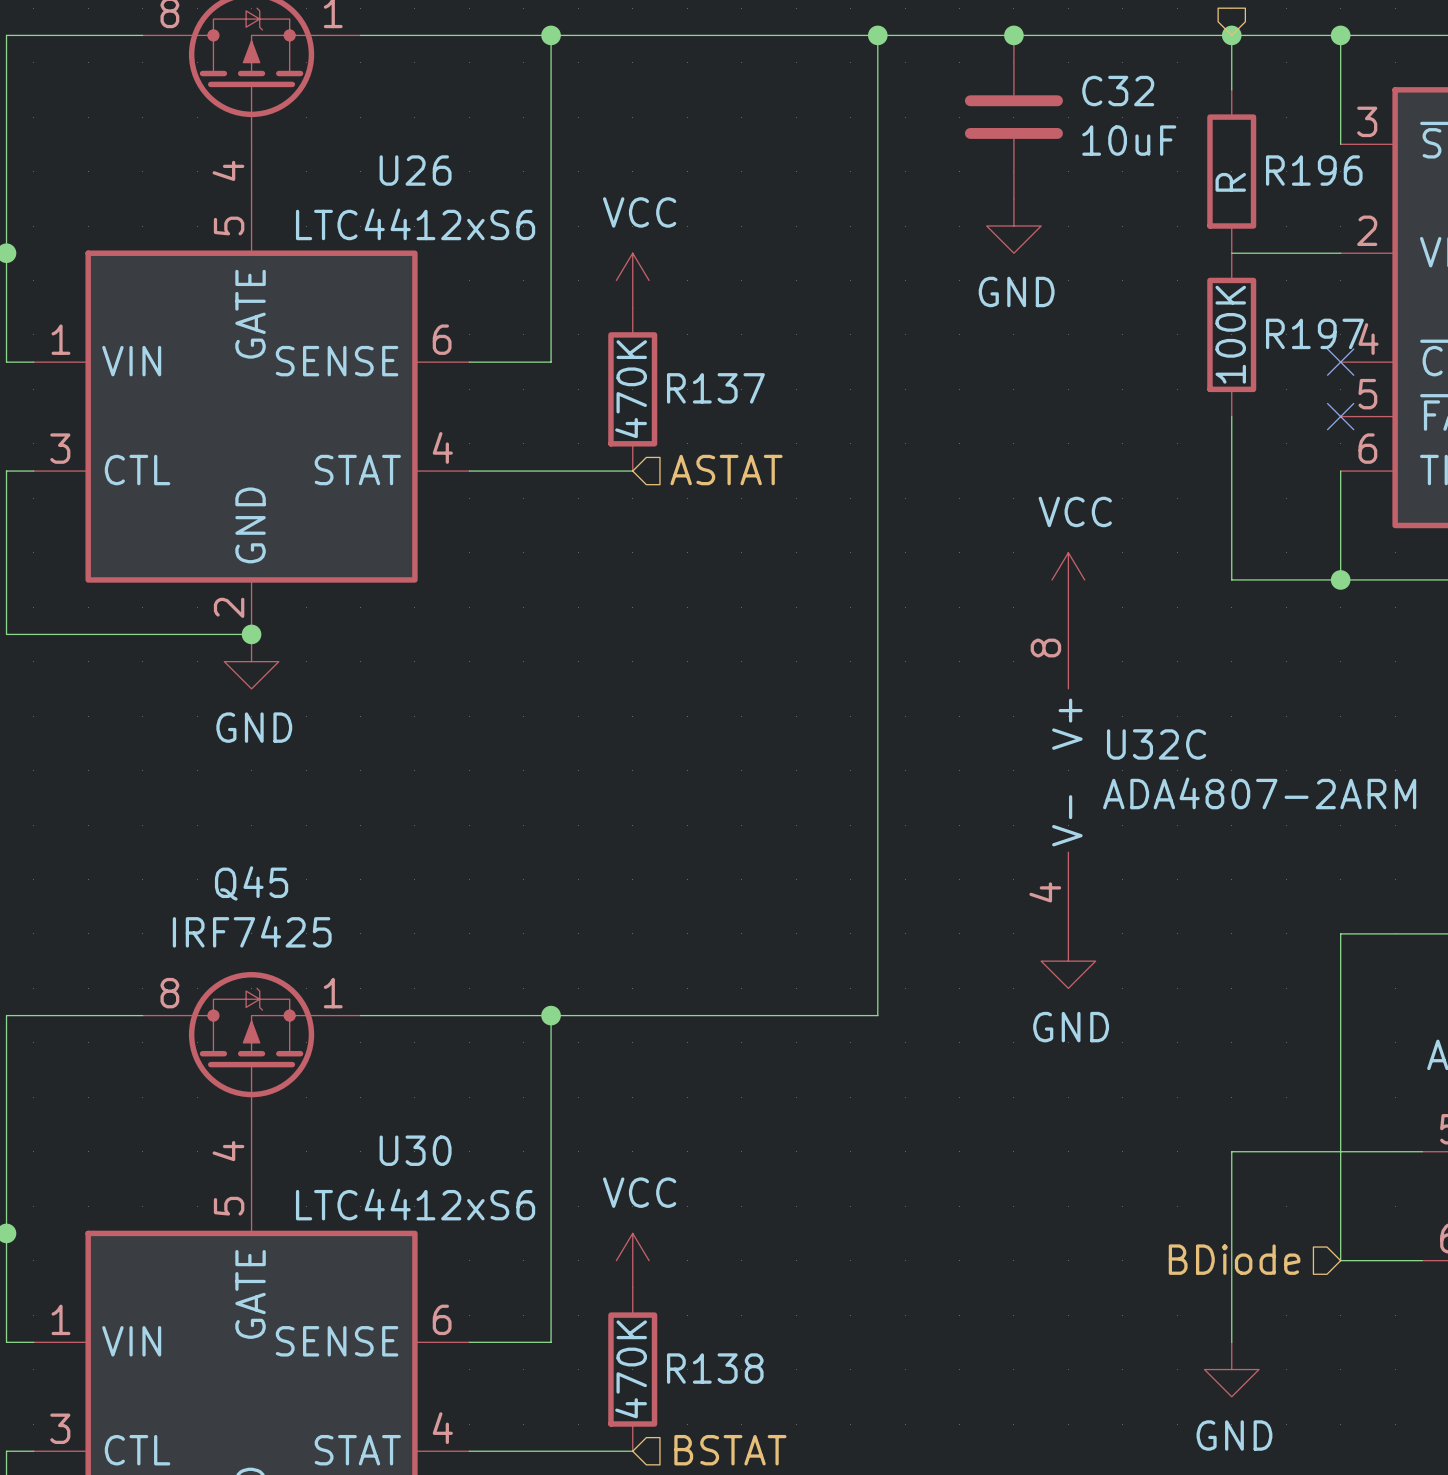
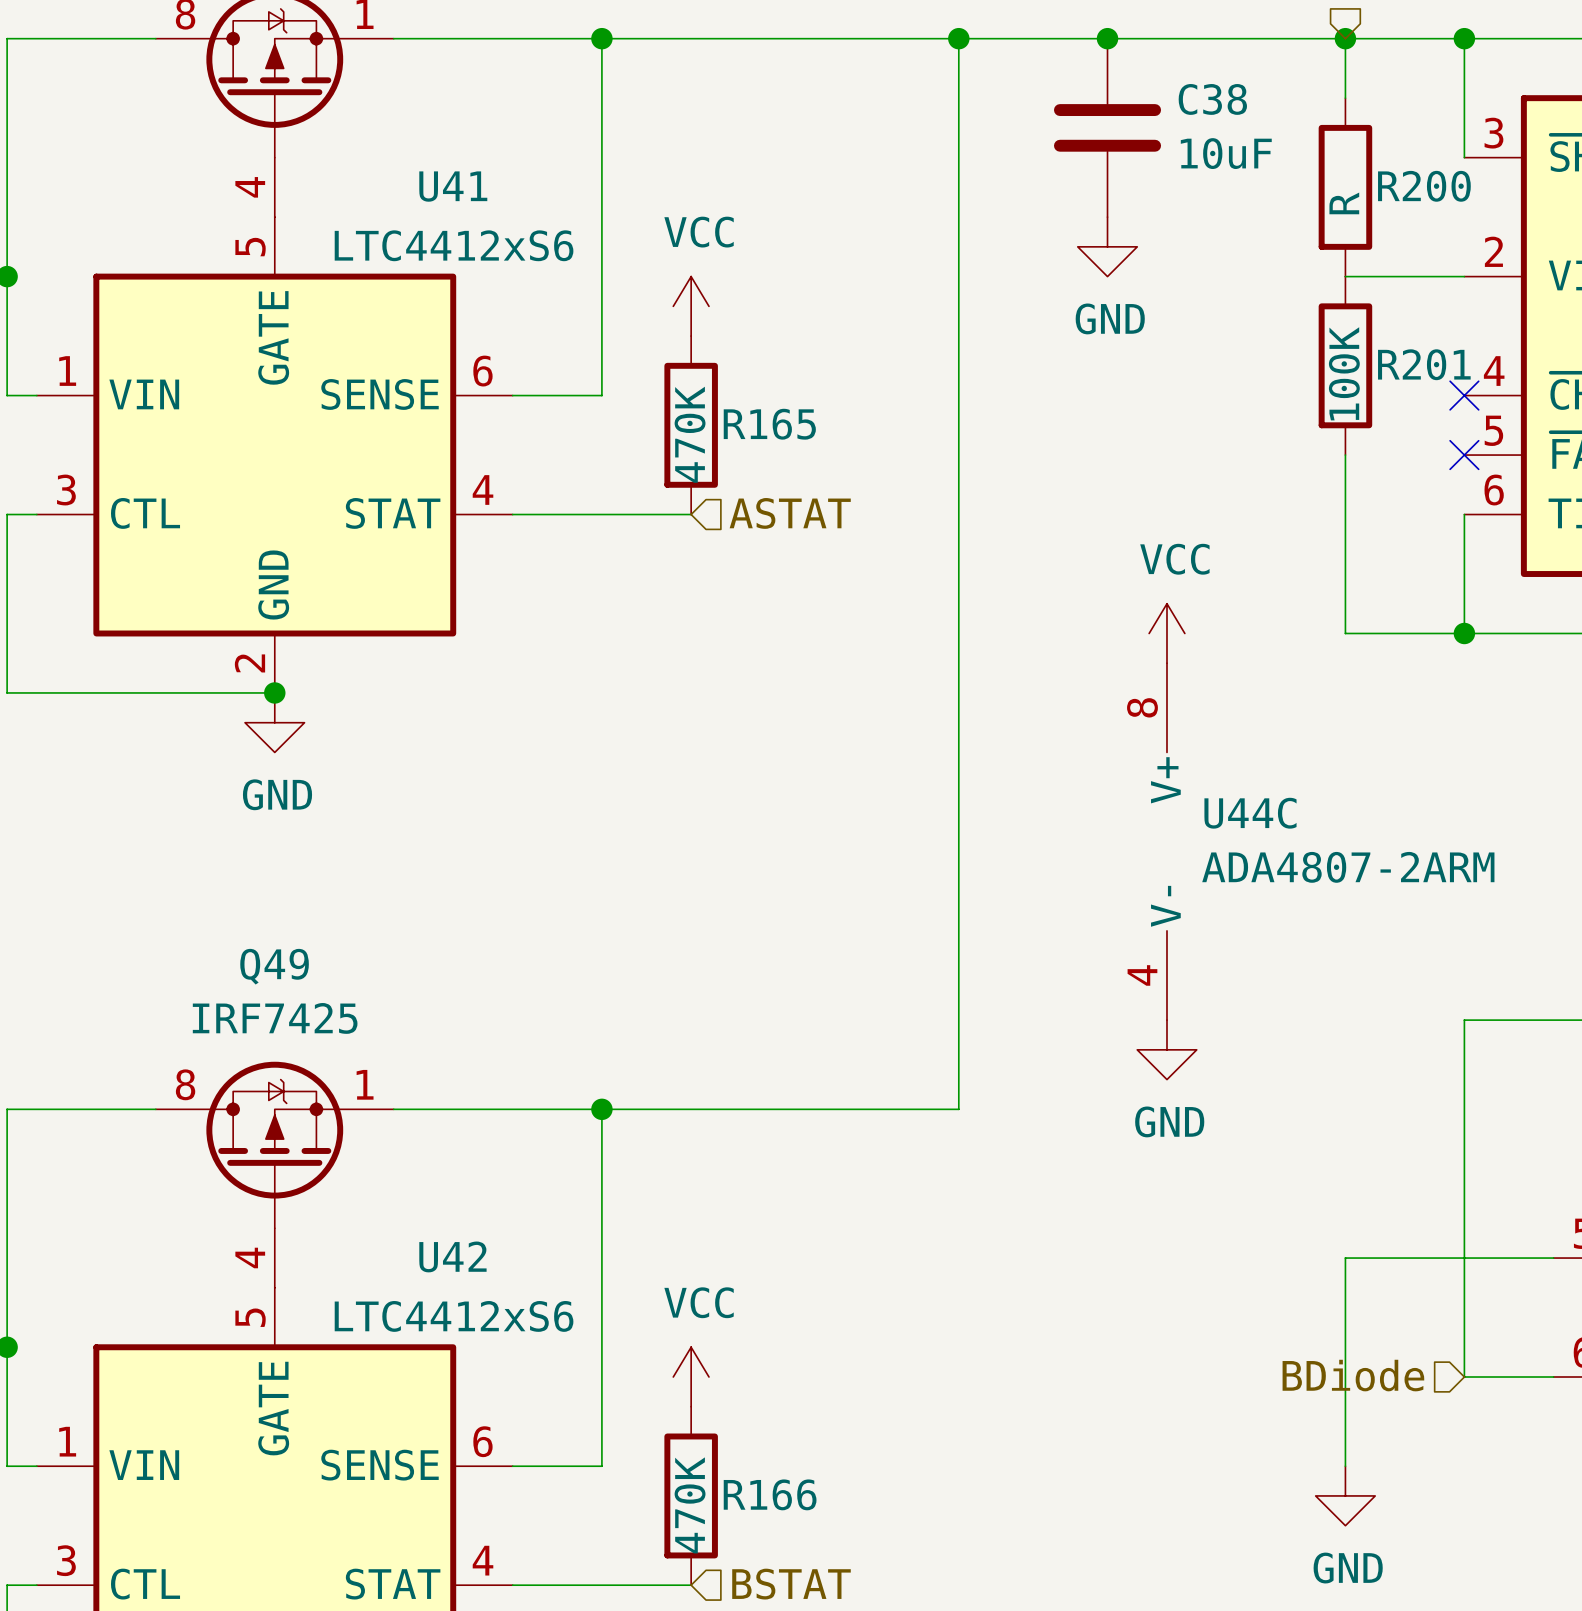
C32 name: C32 (1118, 91) -> C38 (1212, 99)
U26 name: U26 (415, 170) -> U41 (453, 186)
R196 name: R196 (1314, 170) -> R200 (1424, 186)
R197 name: R197 (1314, 333) -> R201 (1424, 364)
R137 name: R137 (715, 388) -> R165 (769, 424)
U32C name: U32C (1156, 744) -> U44C (1250, 813)
Q45 name: Q45 (251, 883) -> Q49 (274, 966)
U30 name: U30 (415, 1150) -> U42 (452, 1256)
R138 name: R138 (715, 1368) -> R166 (770, 1494)

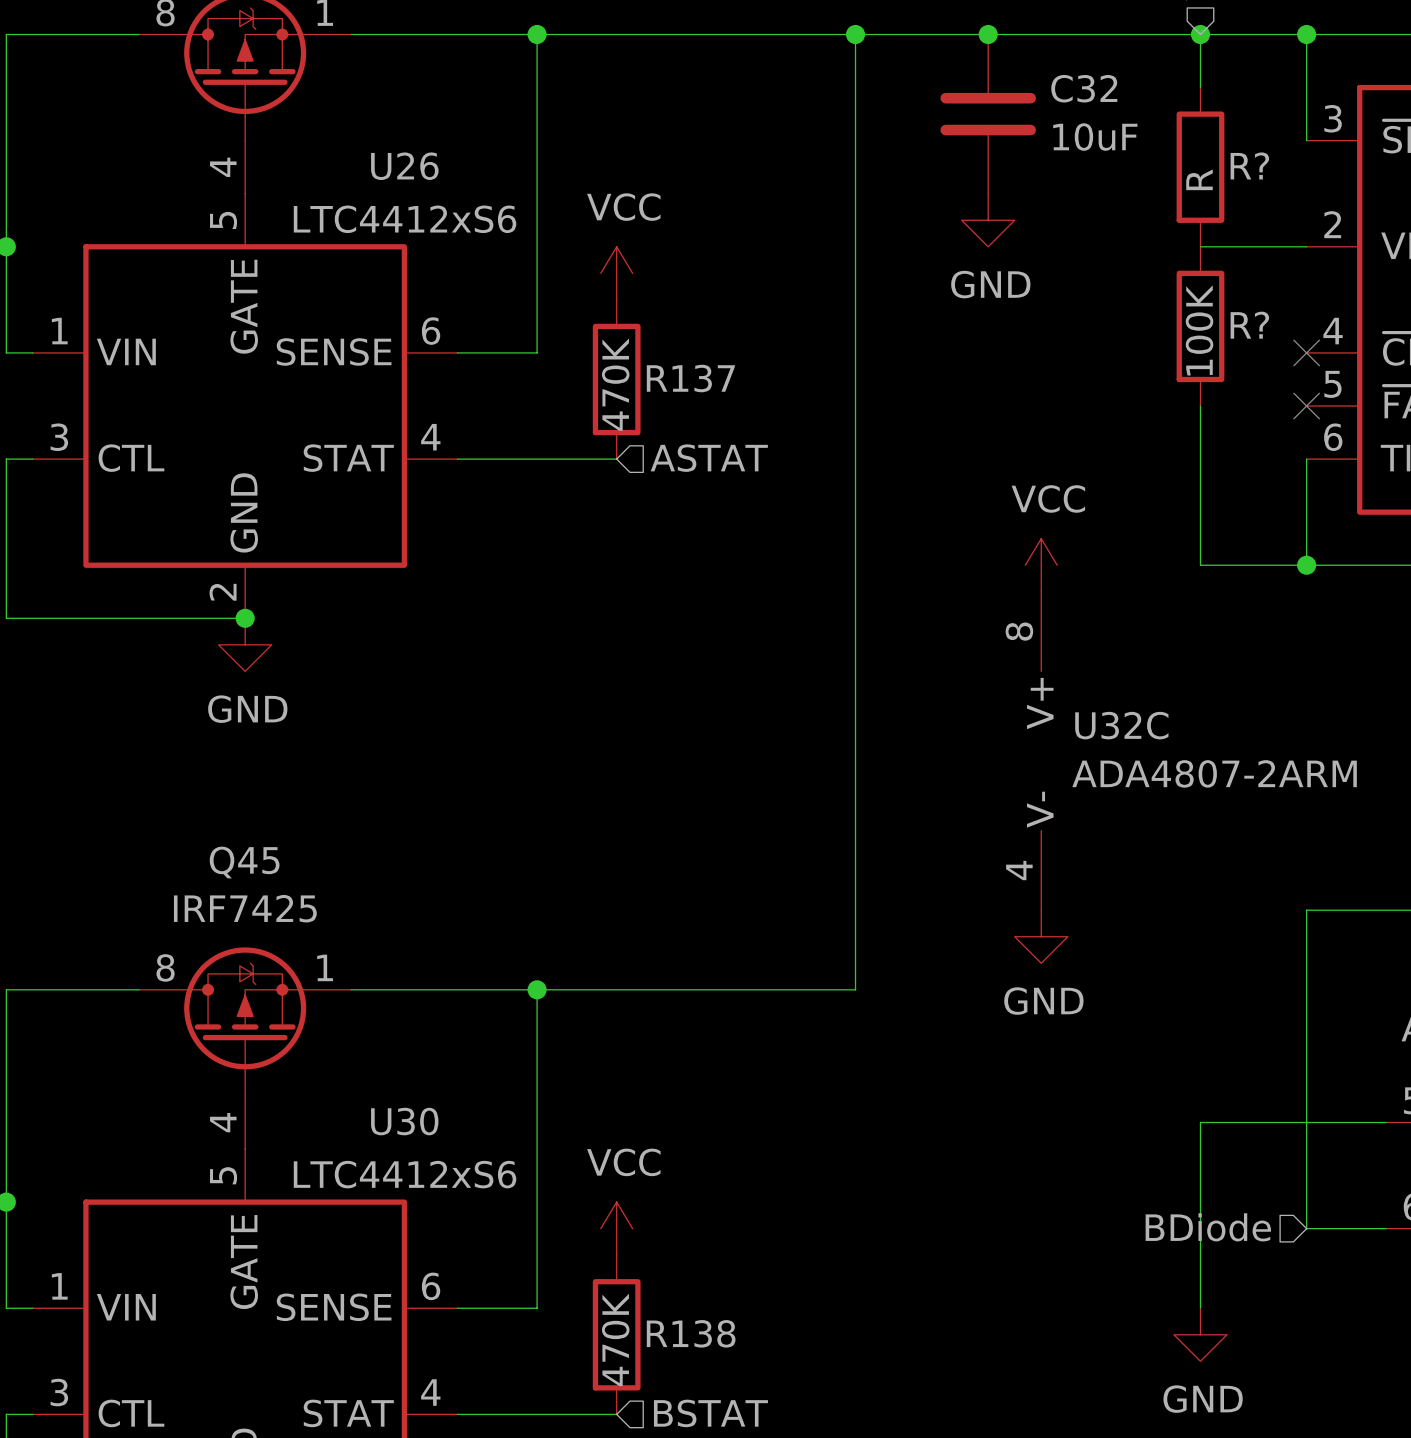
C38 name: C38 (1212, 99) -> C32 (1084, 88)
U41 name: U41 (453, 186) -> U26 (404, 166)
R200 name: R200 (1424, 186) -> R? (1249, 165)
R201 name: R201 (1424, 364) -> R? (1249, 325)
R165 name: R165 (769, 424) -> R137 (690, 378)
U44C name: U44C (1250, 813) -> U32C (1121, 725)
Q49 name: Q49 (274, 966) -> Q45 (244, 862)
U42 name: U42 (452, 1256) -> U30 (404, 1121)
R166 name: R166 (770, 1494) -> R138 (691, 1333)

